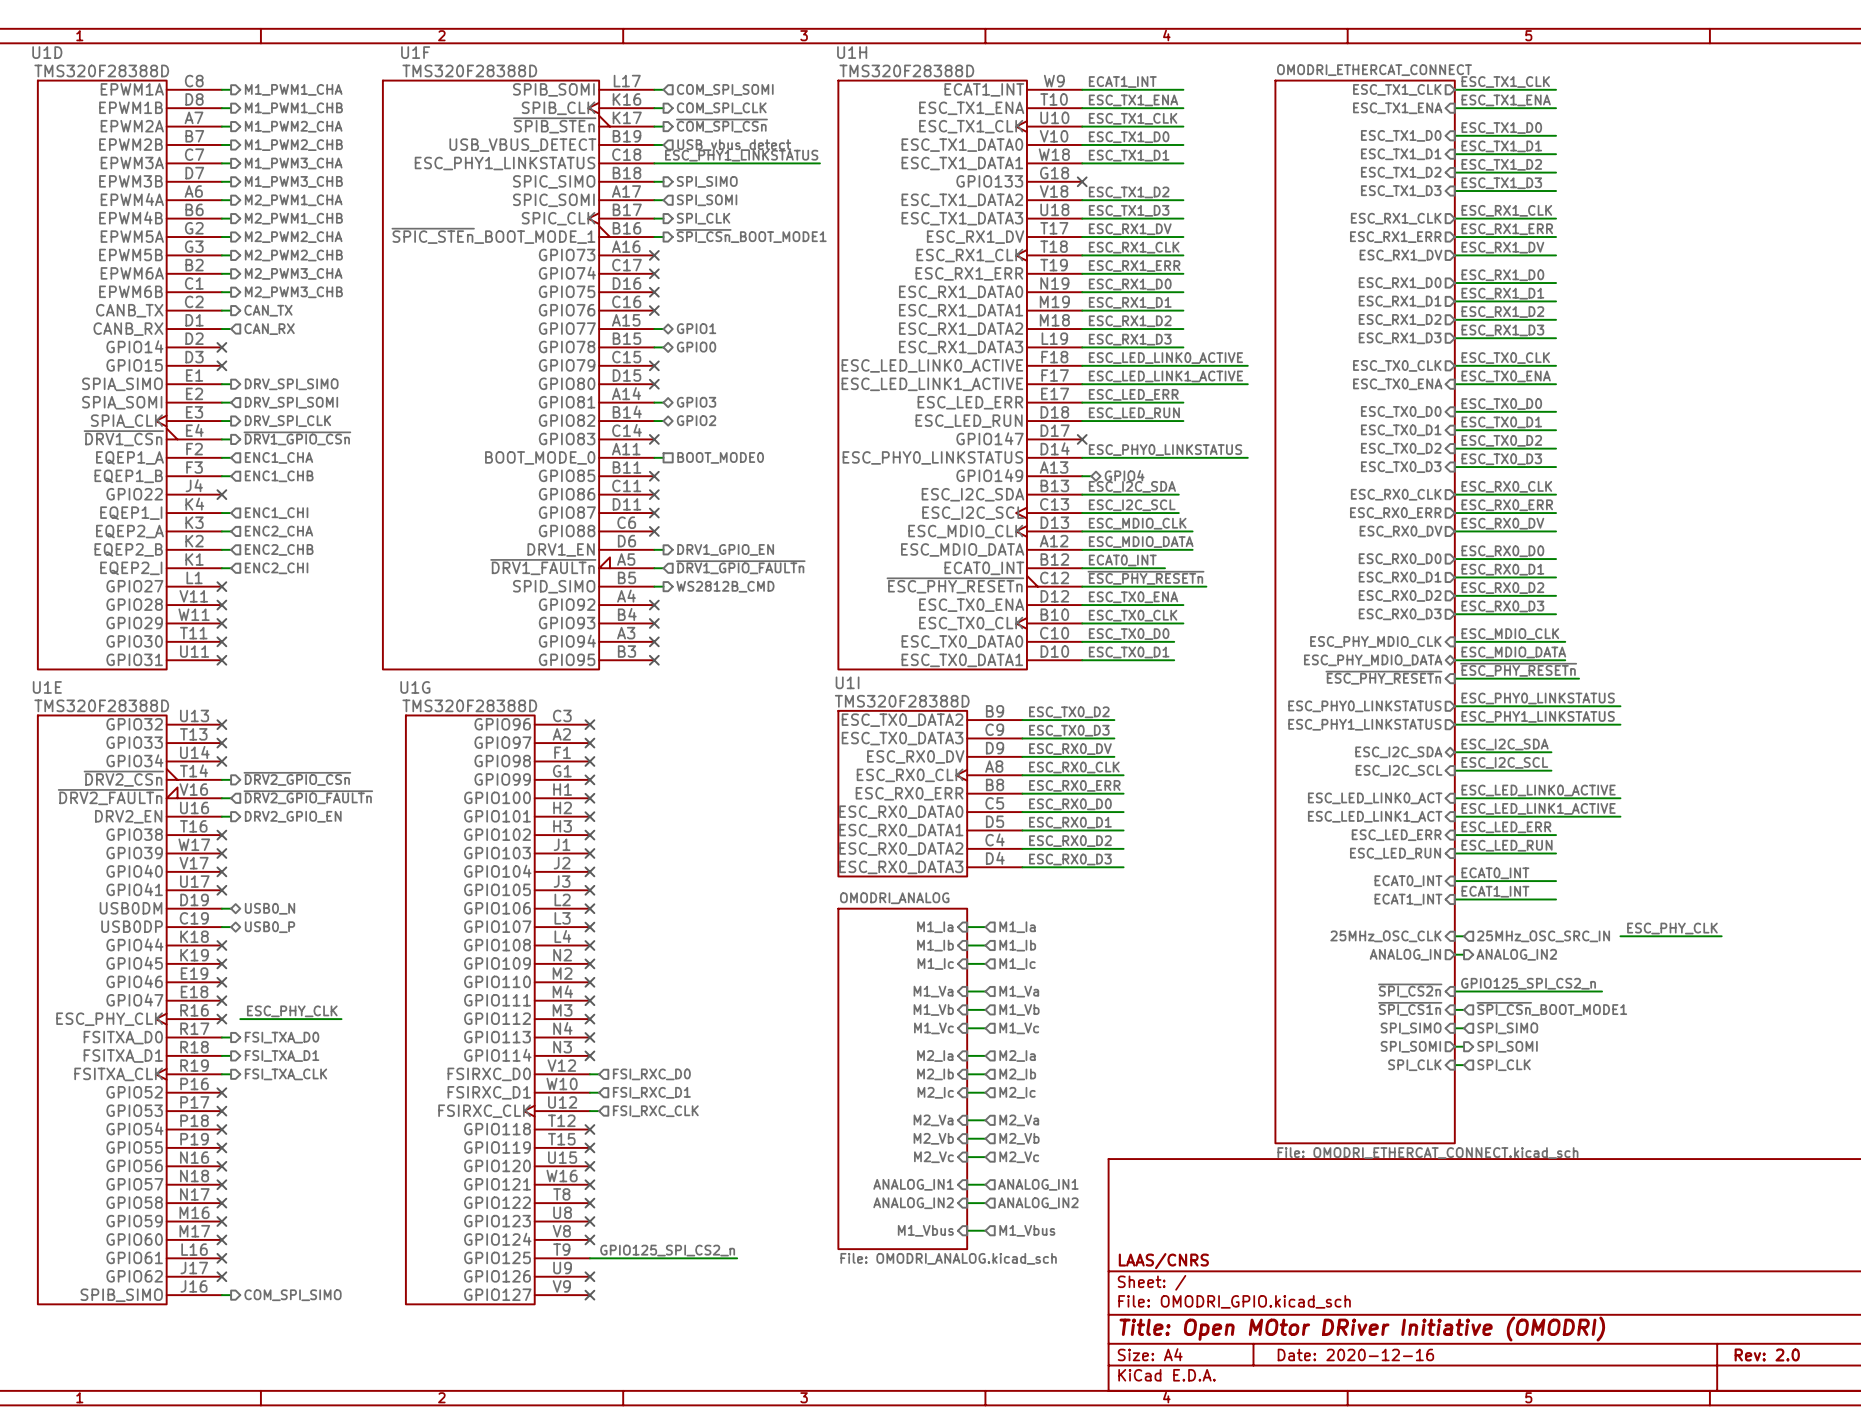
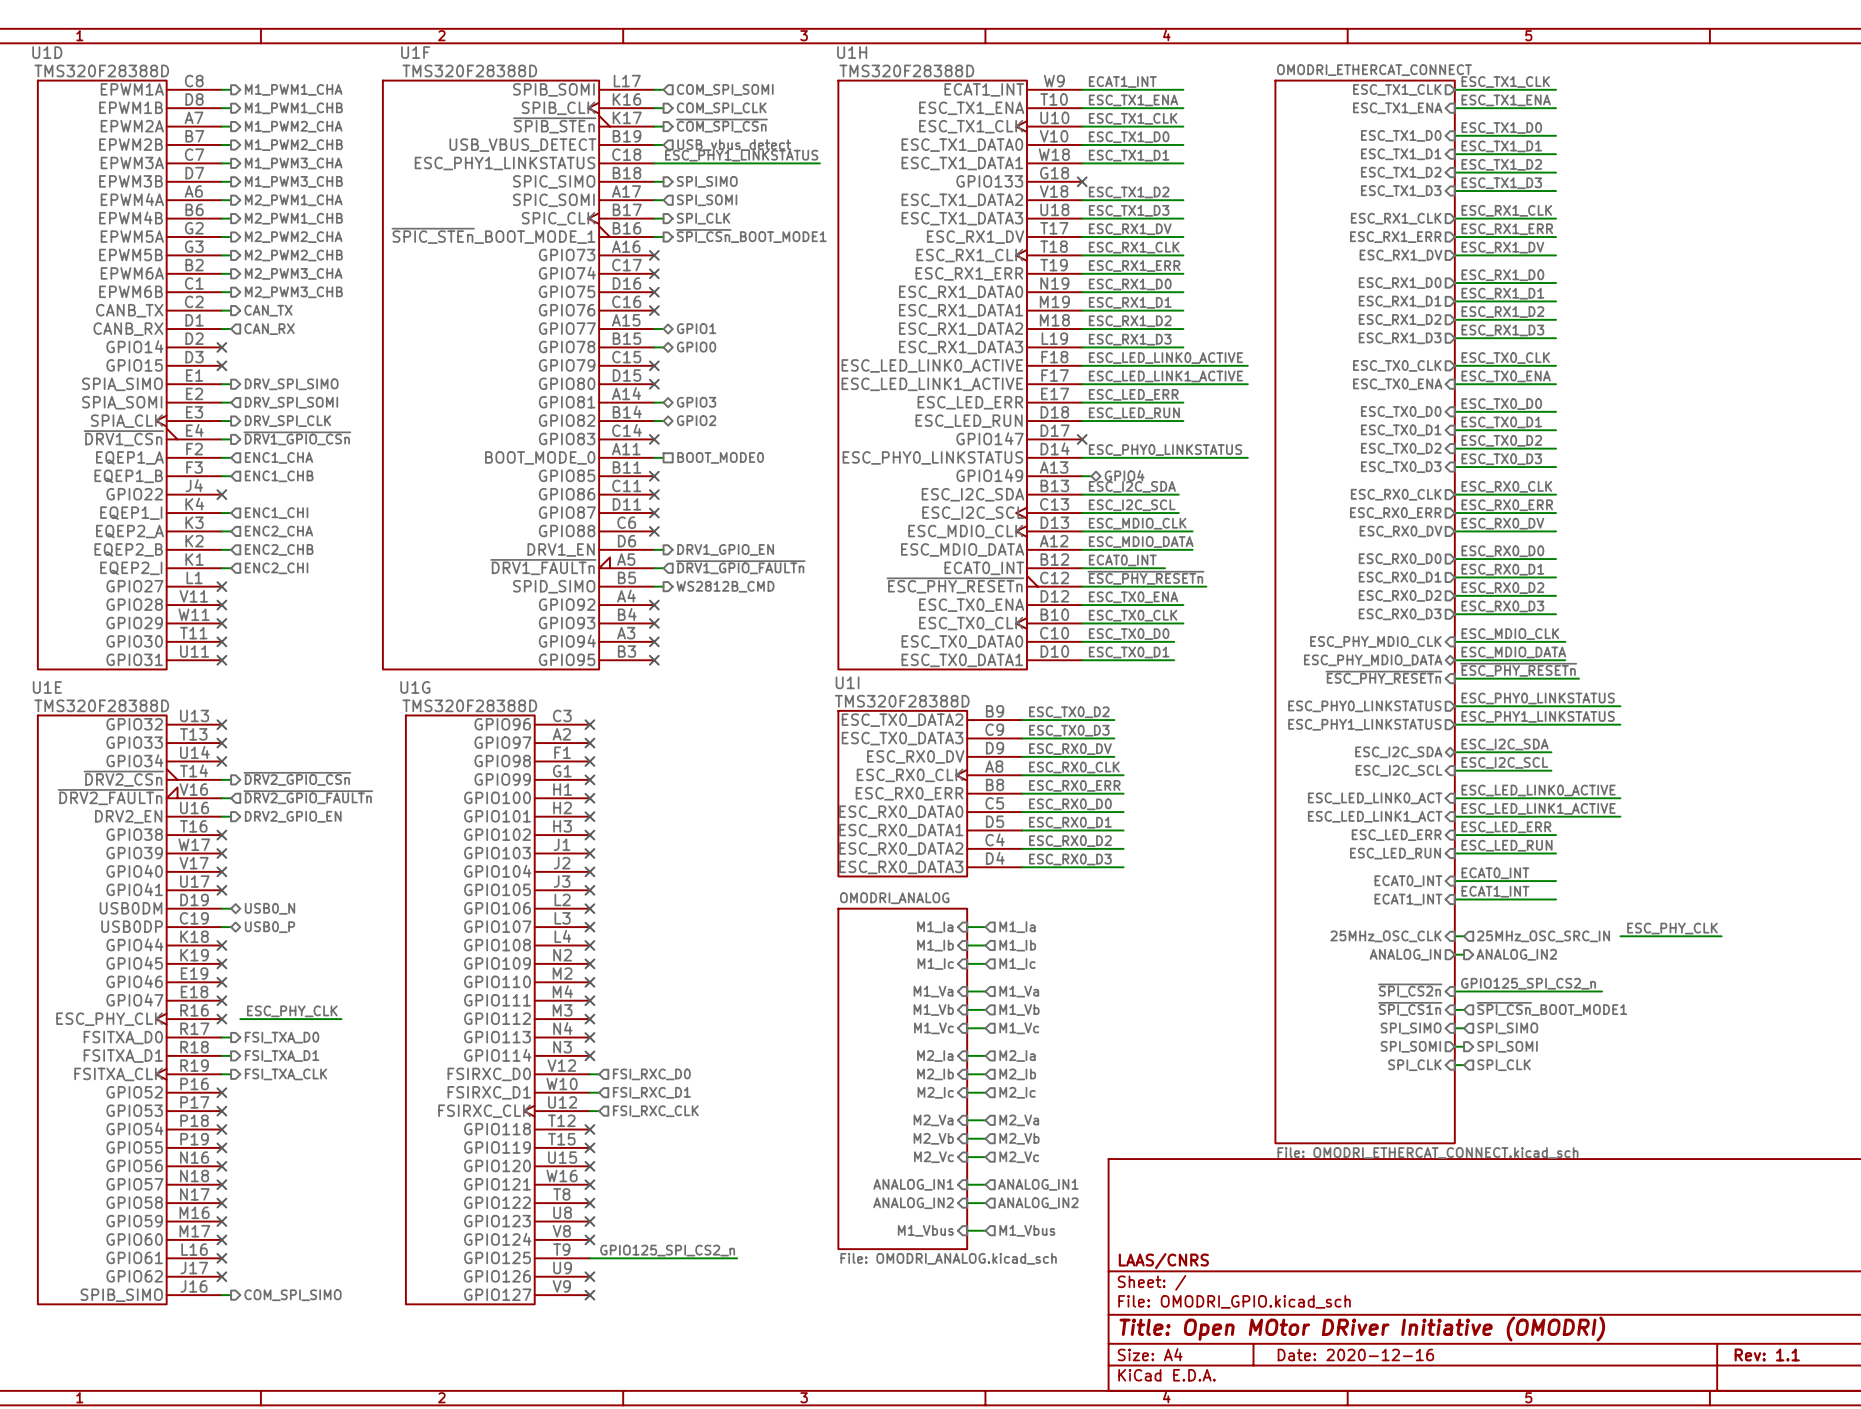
title block: Rev: 2.0 (1767, 1354) -> Rev: 1.1 (1767, 1354)

